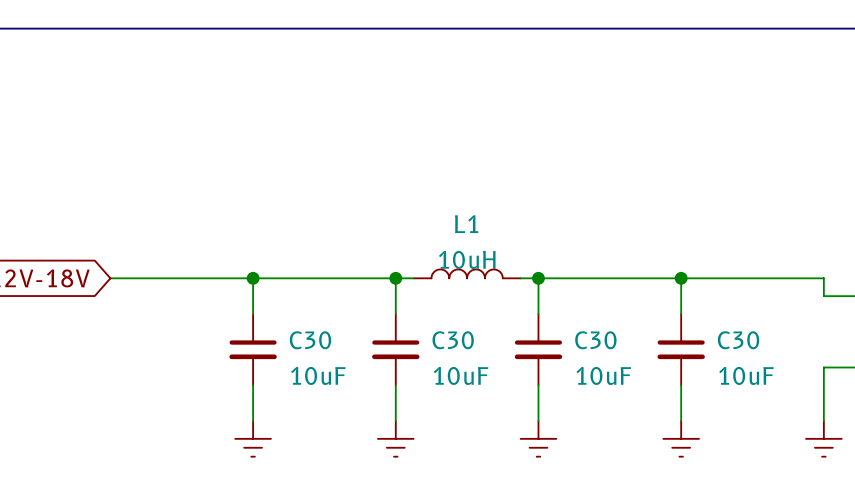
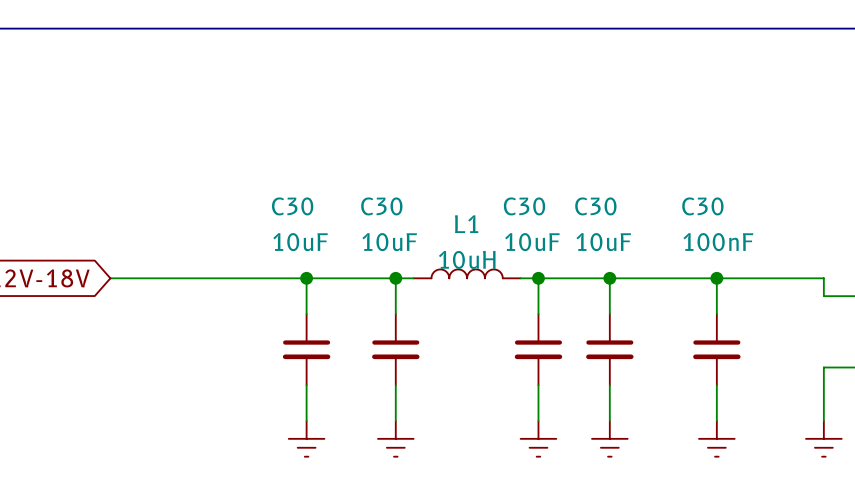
wire: (253, 278) (253, 313) -> (306, 278) (306, 313)
junction position: (253, 278) -> (306, 278)
wire: none -> (609, 278) (609, 313)
junction: none -> (609, 278)
wire: (681, 278) (681, 313) -> (716, 278) (716, 313)
junction: (681, 278) -> none
junction: none -> (716, 278)
C30 name position: C30 (310, 340) -> C30 (292, 206)
C30 name position: C30 (453, 340) -> C30 (381, 206)
C30 name position: C30 (595, 340) -> C30 (524, 206)
C30 name position: C30 (738, 340) -> C30 (595, 206)
C30 position: (253, 349) -> (306, 349)
C30 position: (681, 349) -> (609, 349)
C30: none -> 100nF (716, 349)
C30 value position: 10uF (318, 375) -> 10uF (300, 242)
C30 value position: 10uF (461, 375) -> 10uF (389, 242)
C30 value position: 10uF (603, 375) -> 10uF (532, 242)
C30 value position: 10uF (746, 375) -> 10uF (603, 242)
wire: (253, 385) (253, 421) -> (306, 385) (306, 421)
wire: none -> (609, 385) (609, 421)
wire: (681, 385) (681, 421) -> (716, 385) (716, 421)
power symbol position: (253, 438) -> (306, 438)
power symbol: none -> (609, 438)
power symbol: (681, 438) -> none
power symbol: none -> (716, 438)

